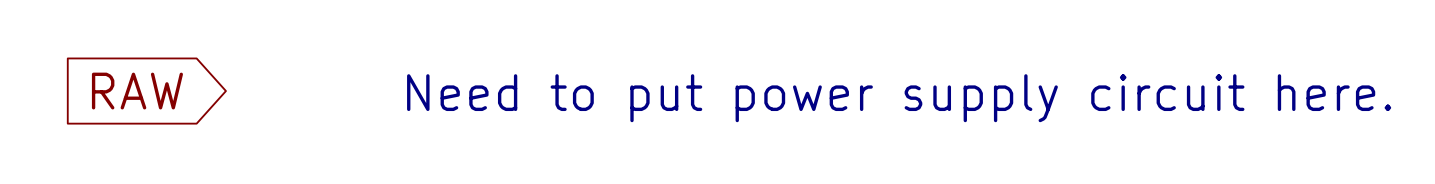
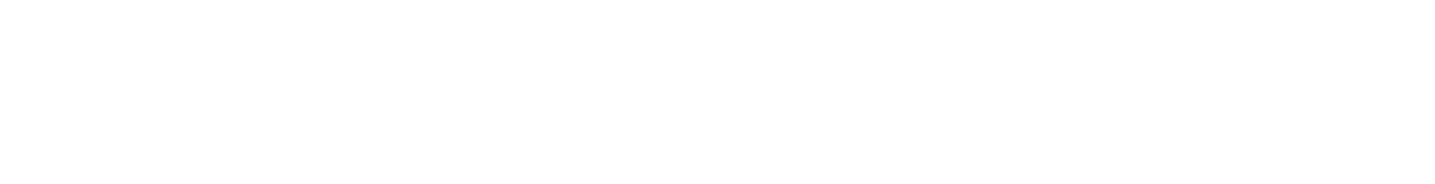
global label: RAW (137, 91) -> none
text: Need to put power supply circuit here. (899, 98) -> none

